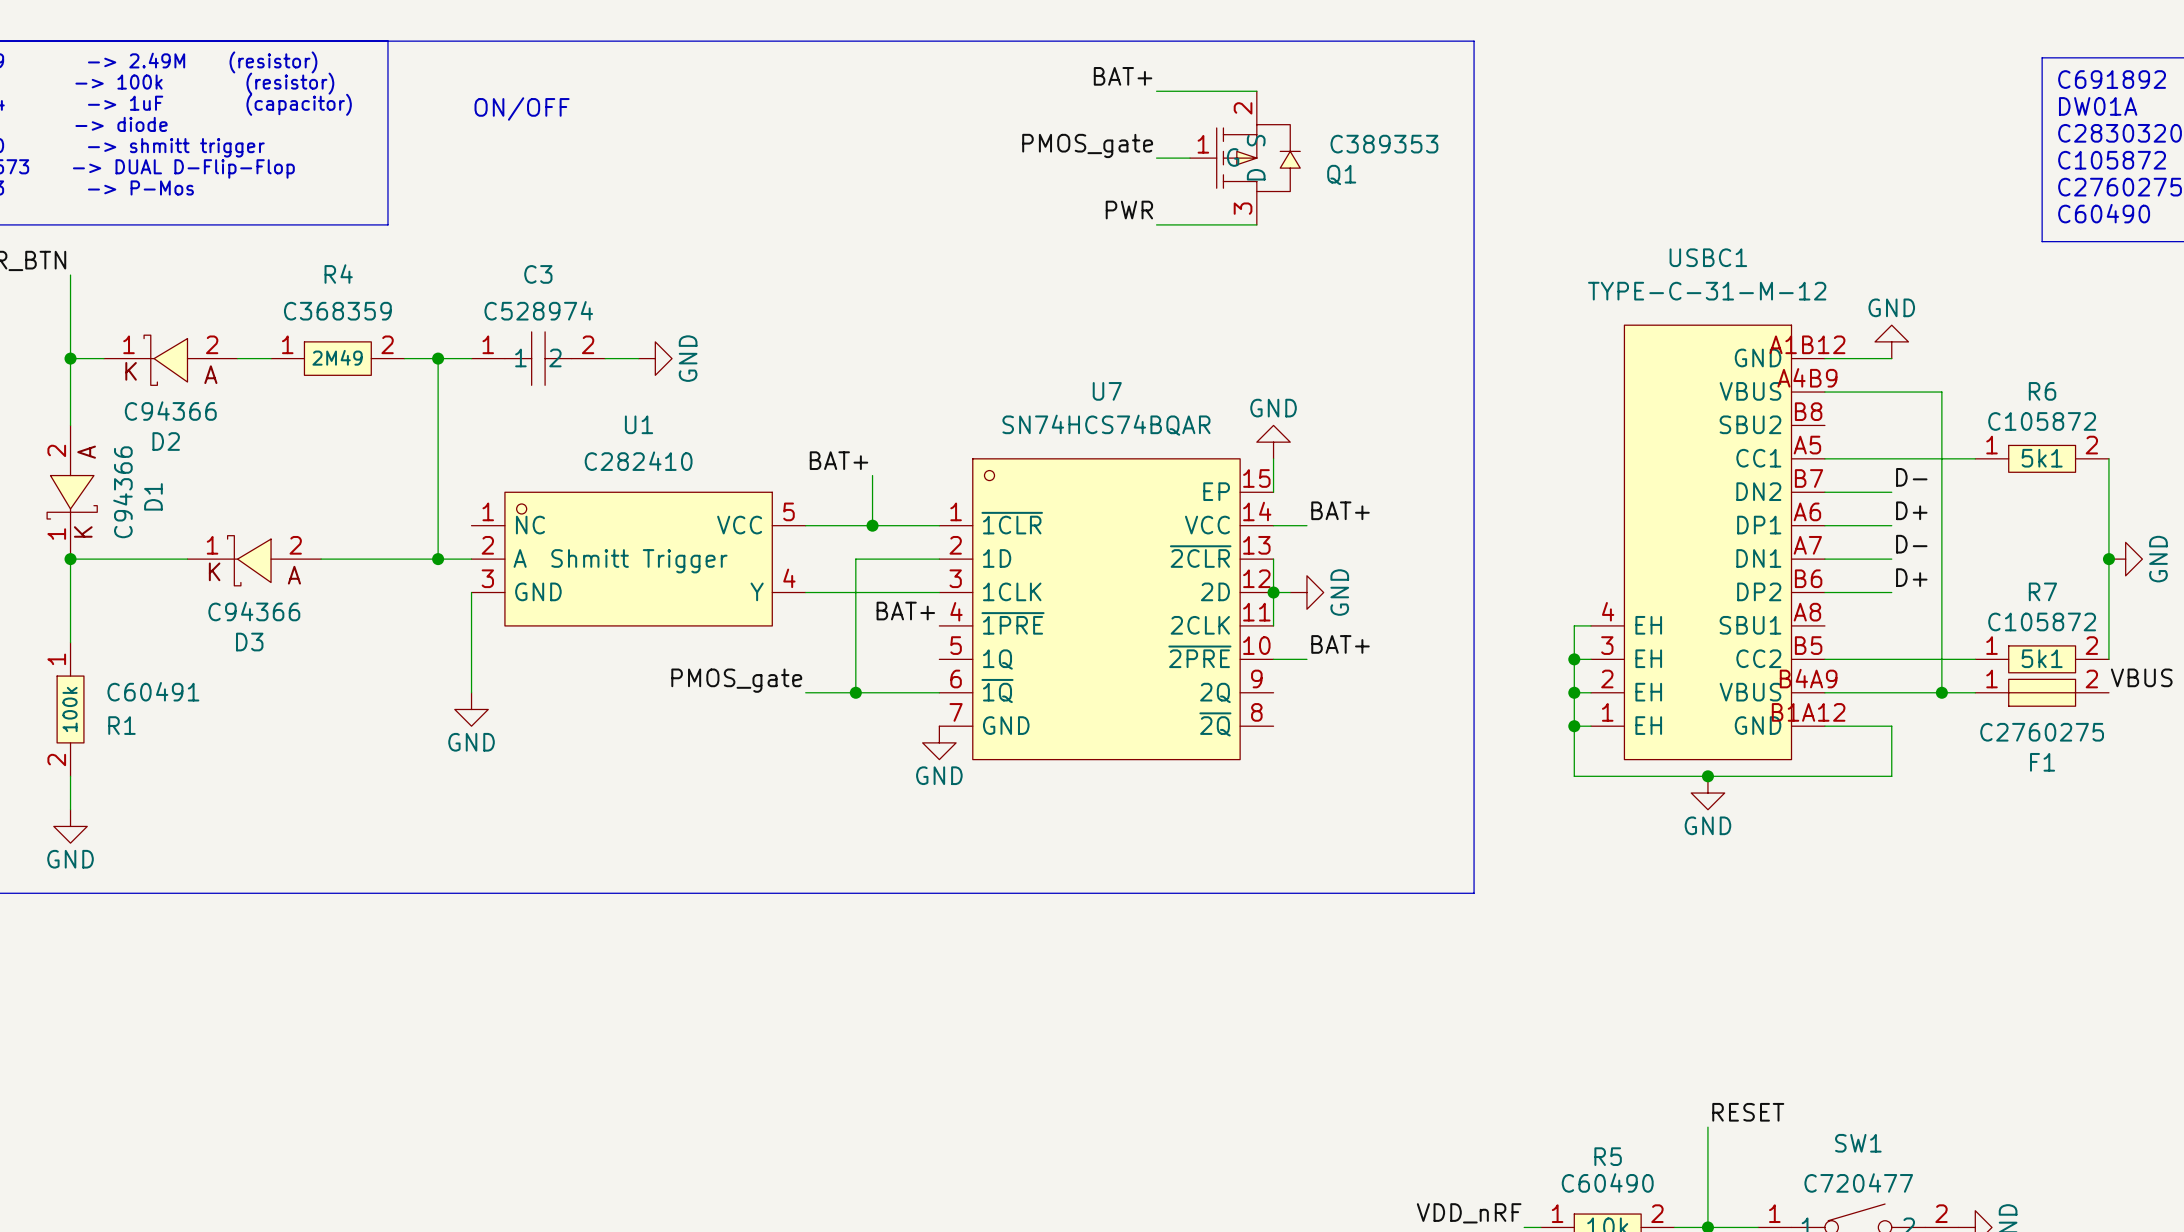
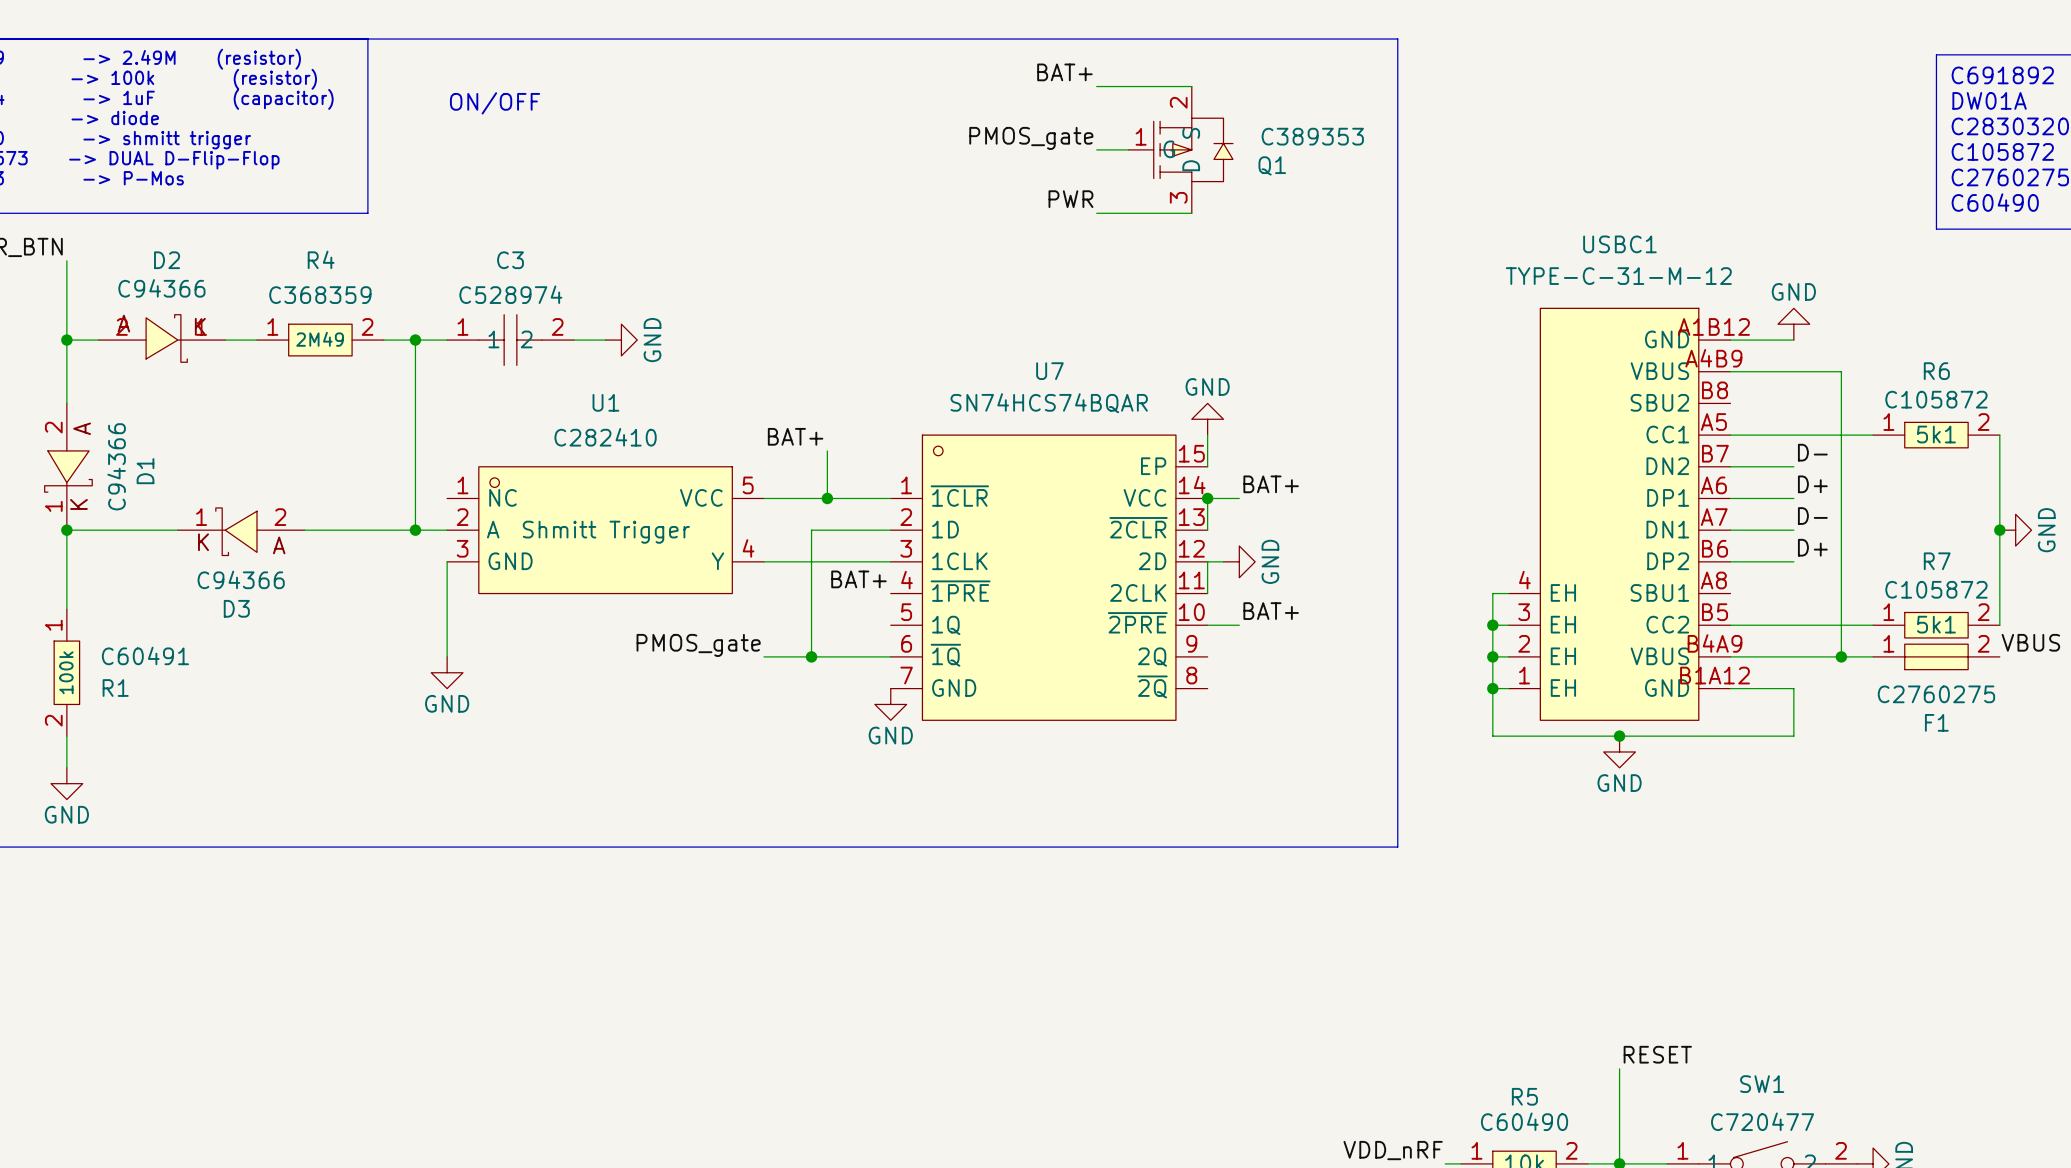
D2 rotation: 0° (165, 360) -> 180° (166, 338)
wire: (1273, 559) (1273, 592) -> (1207, 530) (1207, 498)
junction position: (1273, 592) -> (1207, 498)

